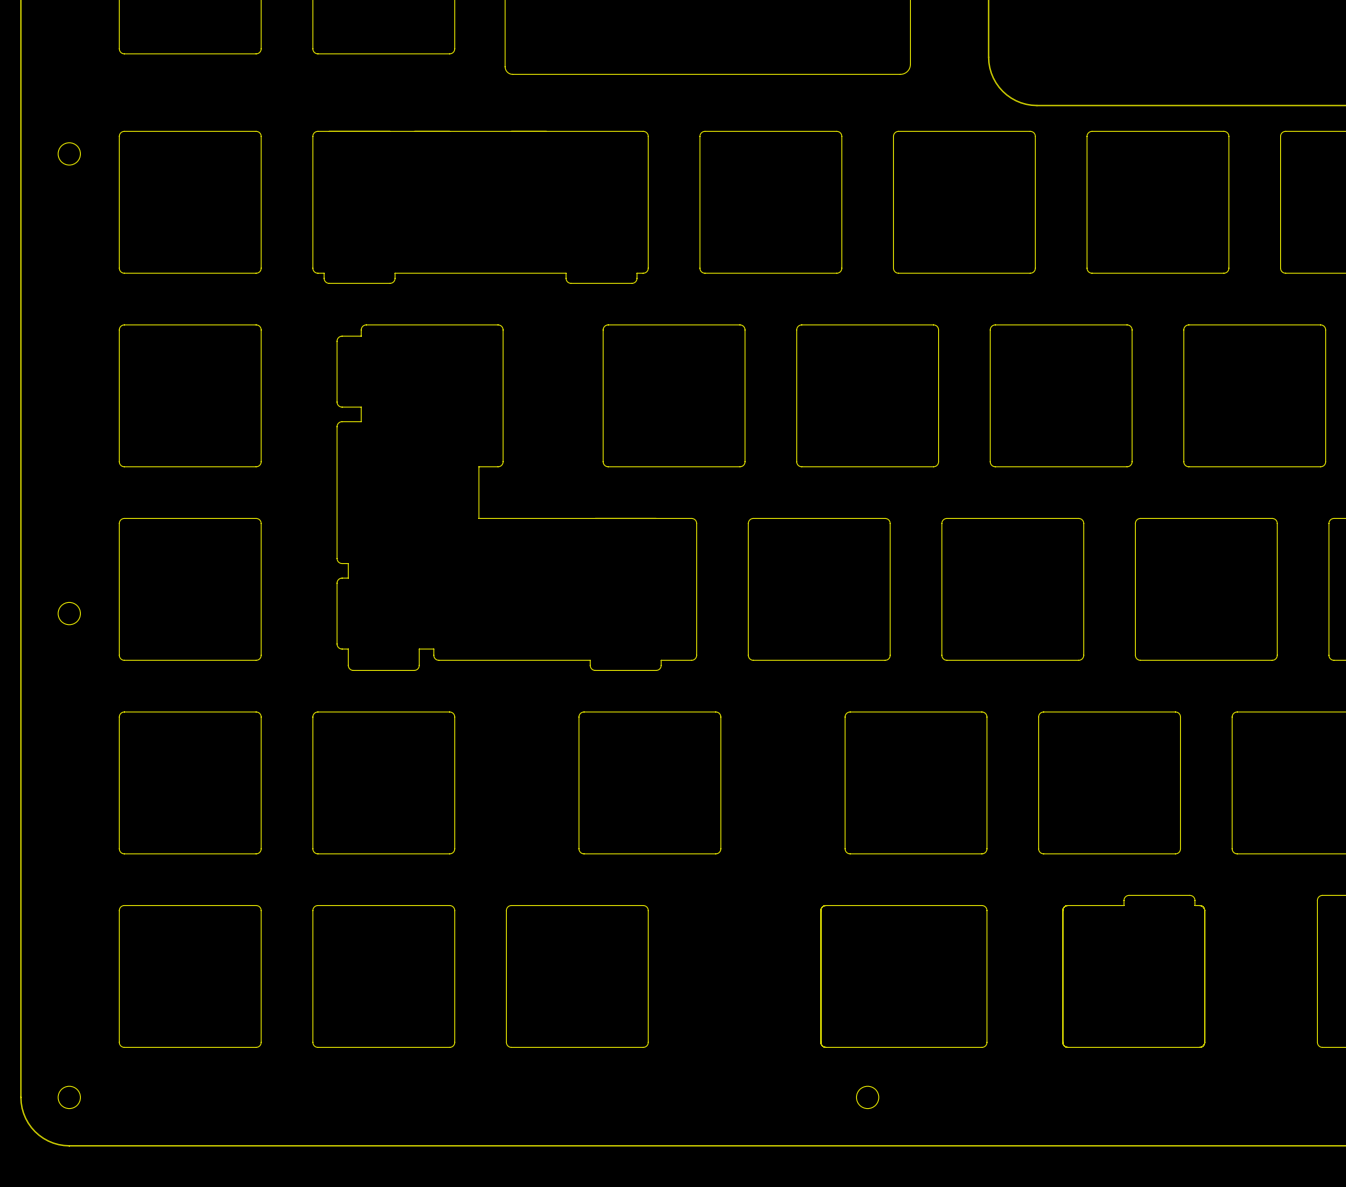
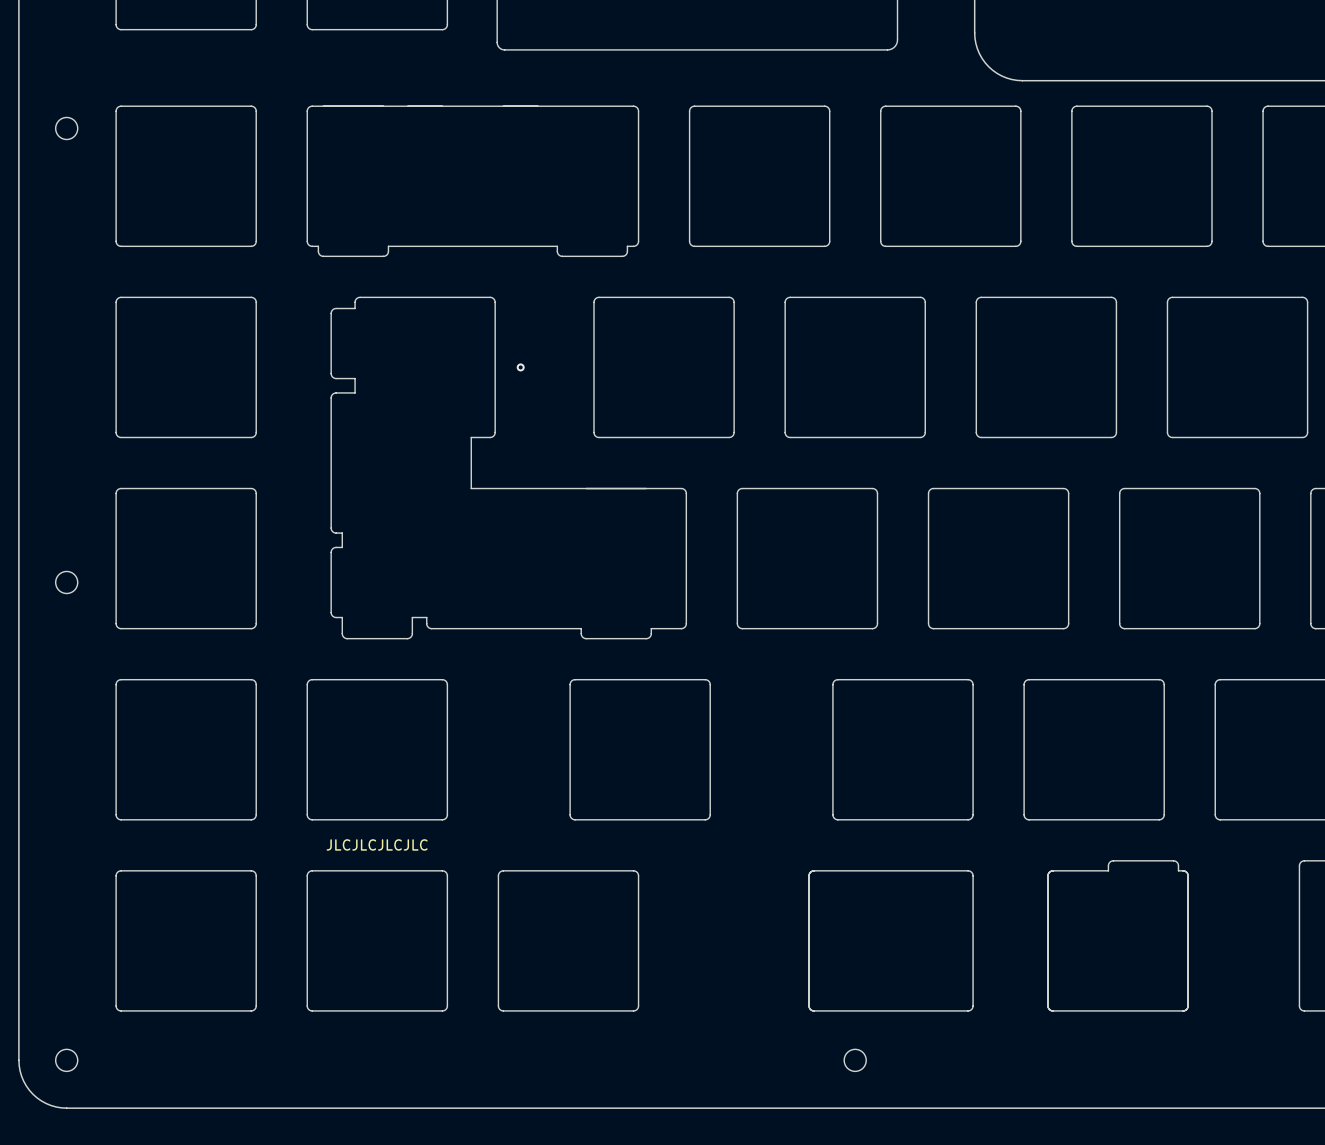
via: none -> (520, 367)
text: none -> JLCJLCJLCJLC (377, 844)

